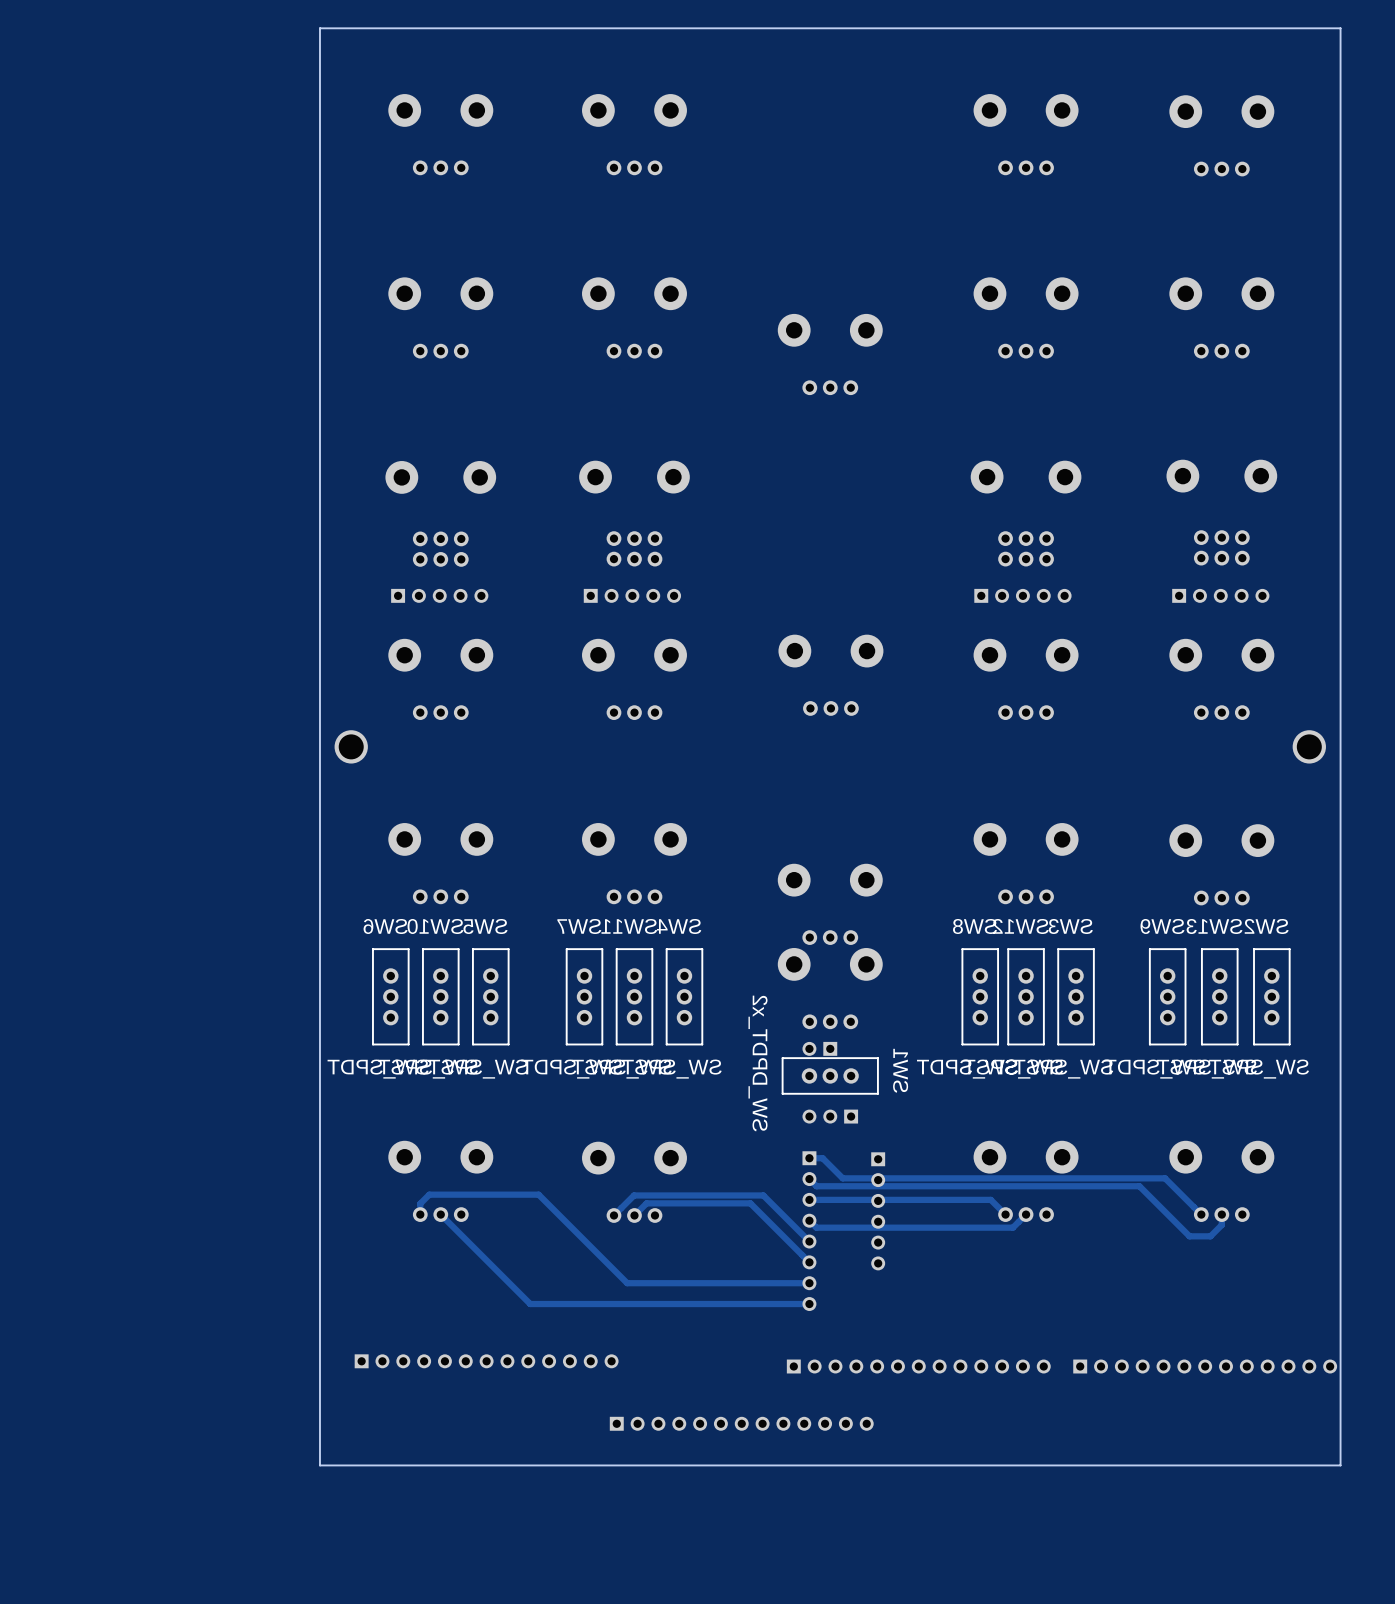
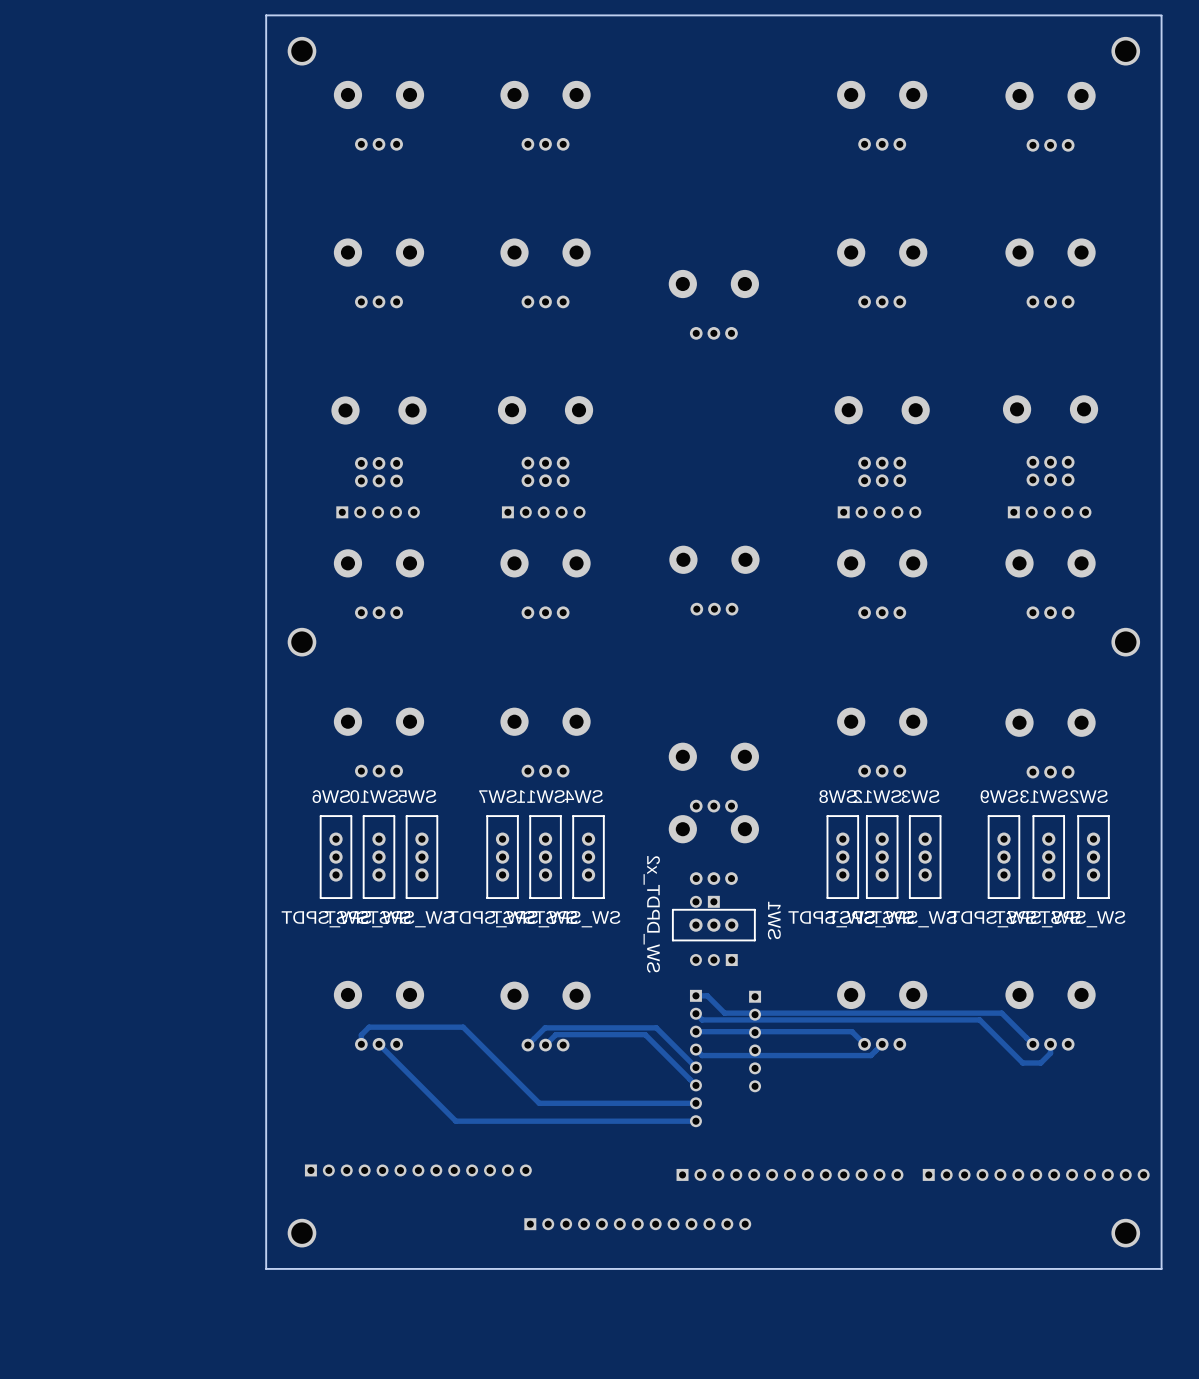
board edge: none -> (1161, 15) (266, 15) (266, 1268) (1161, 1268) (1161, 15)
board edge: (1340, 28) (1340, 1465) (319, 1465) (319, 28) (1340, 28) -> none
part: none -> (301, 51)
part: none -> (1125, 51)
part: none -> (301, 1233)
part: none -> (1125, 1233)

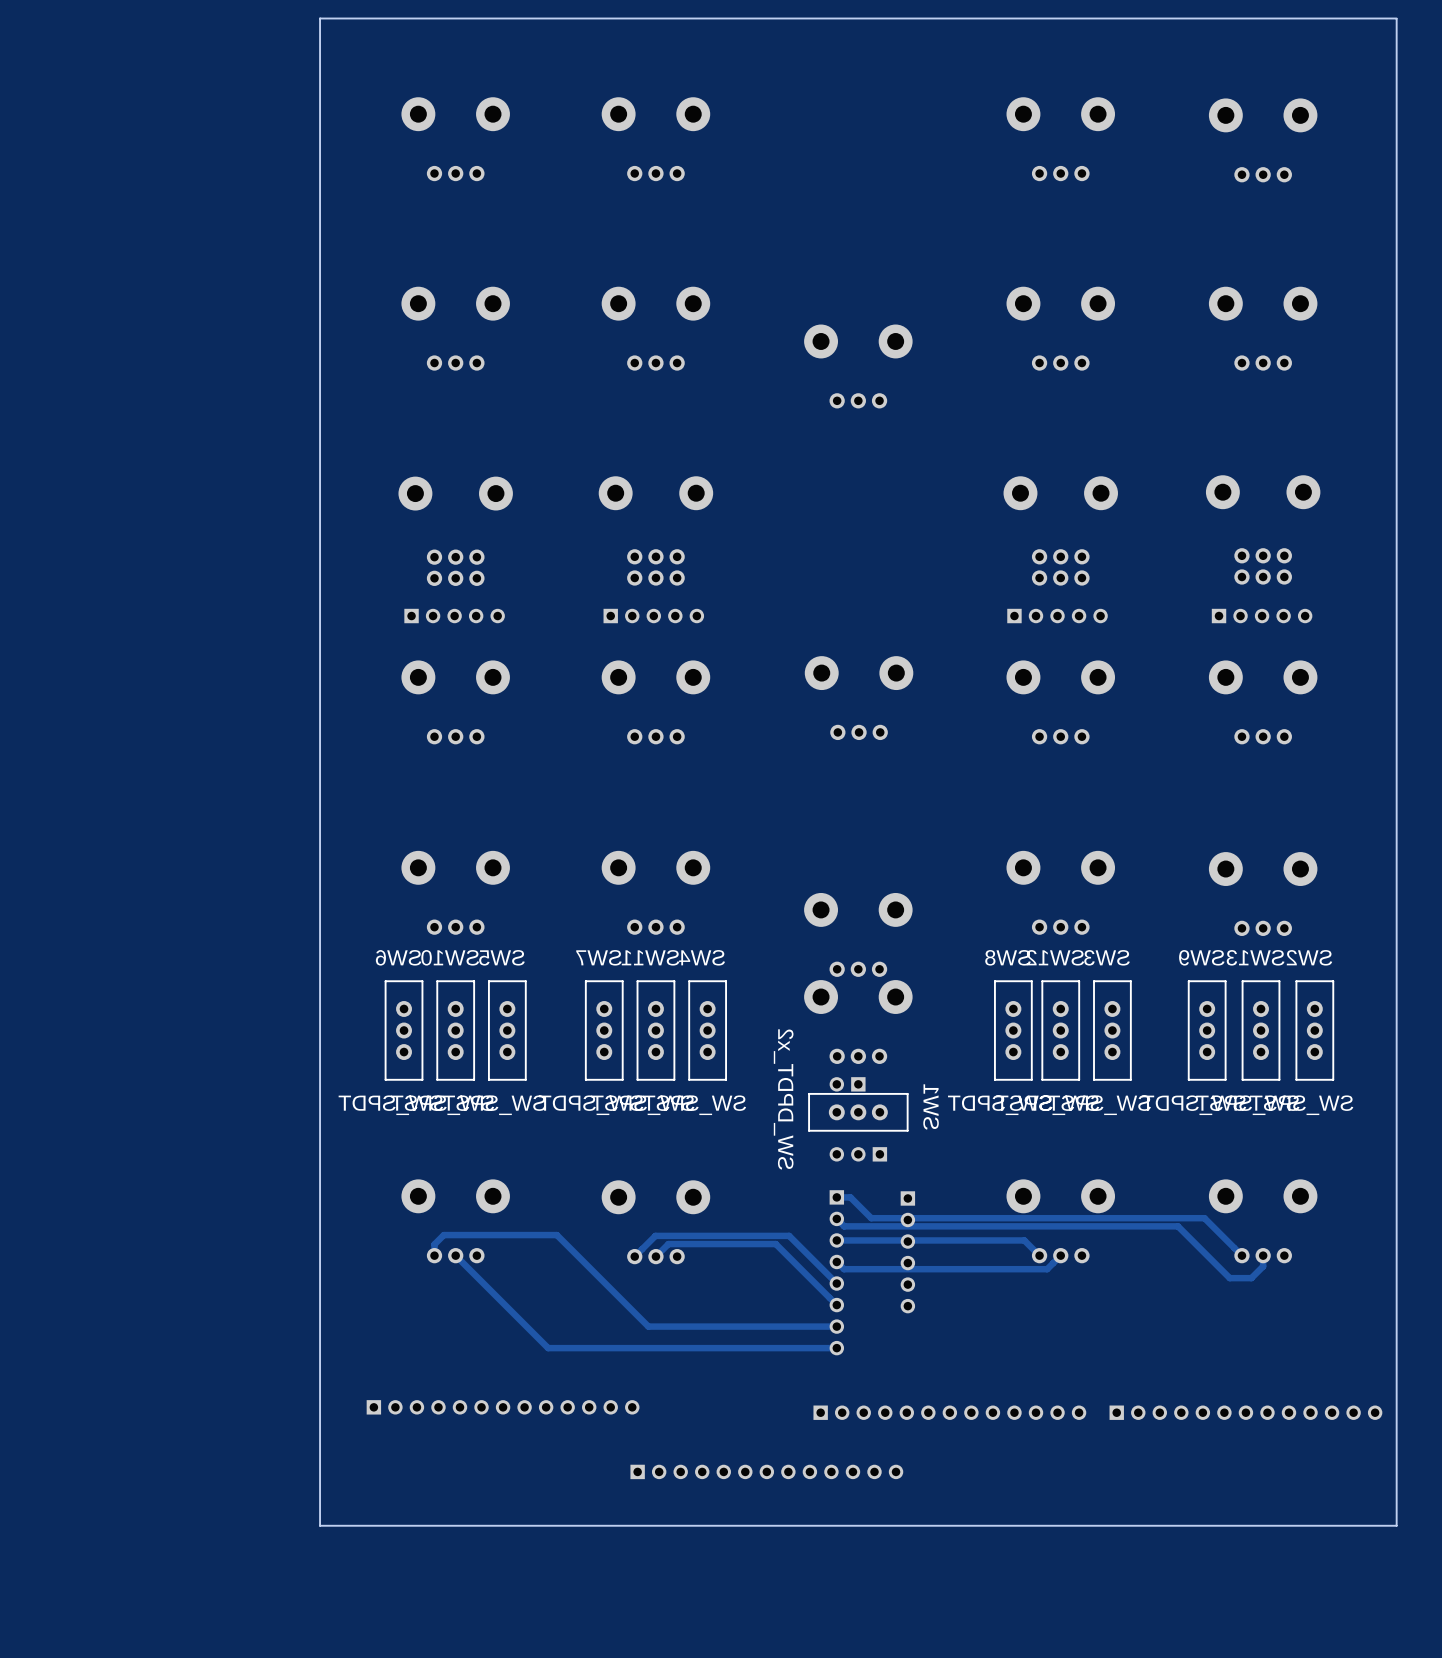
part: (301, 51) -> none
part: (1125, 51) -> none
part: (301, 642) -> none
part: (1125, 642) -> none
part: (301, 1233) -> none
part: (1125, 1233) -> none

